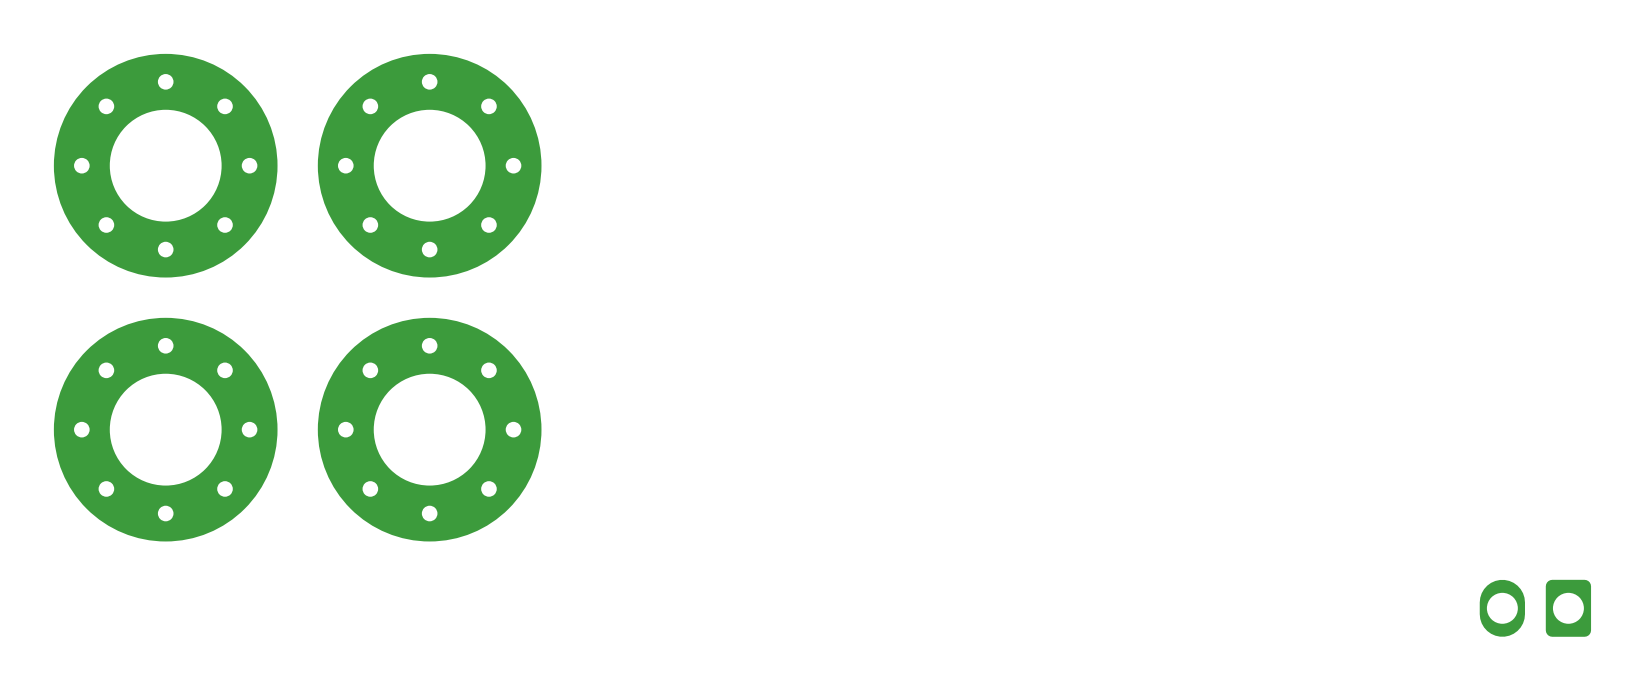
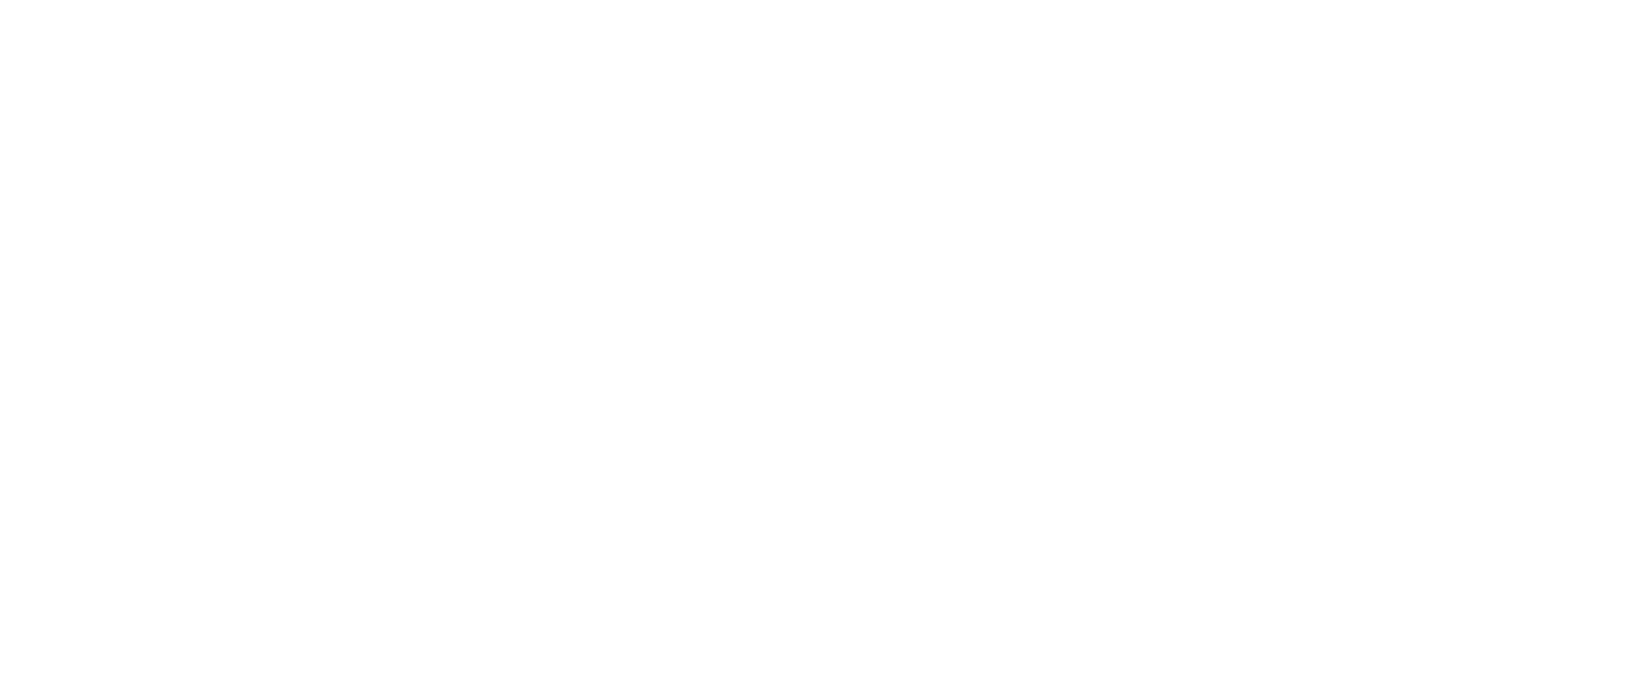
part: (165, 165) -> none
part: (429, 165) -> none
part: (165, 429) -> none
part: (429, 429) -> none
part: (1535, 608) -> none

